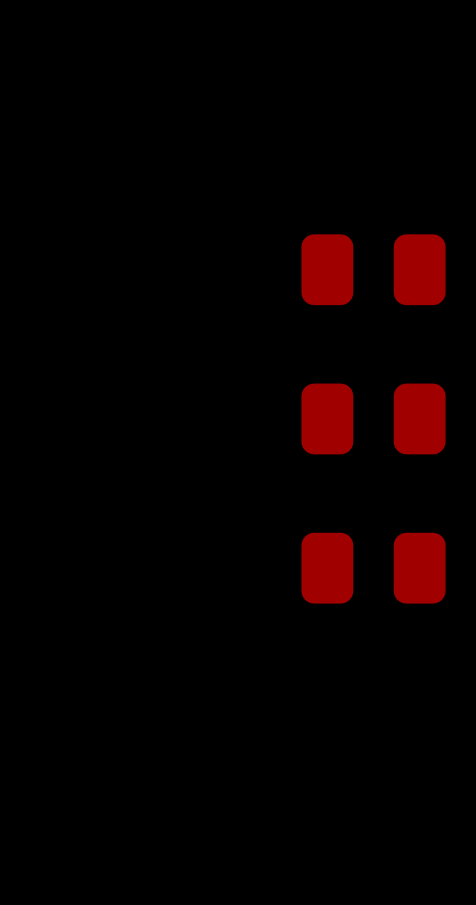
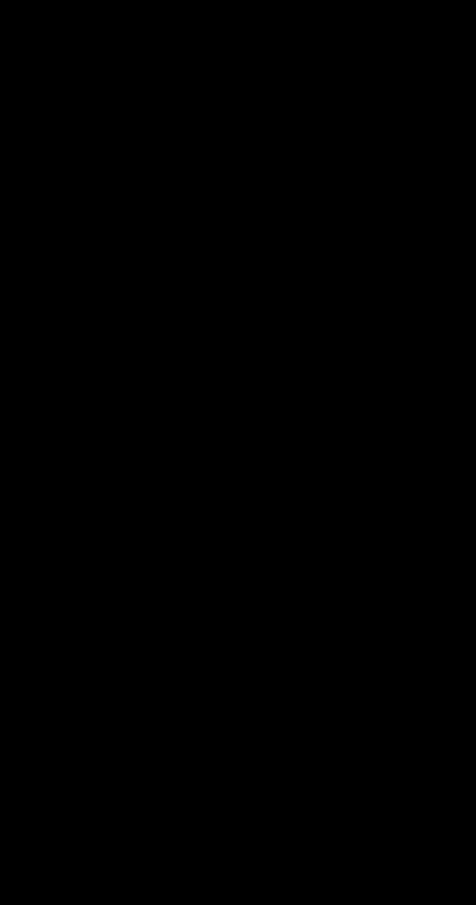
part: (373, 269) -> none
part: (373, 418) -> none
part: (373, 568) -> none

